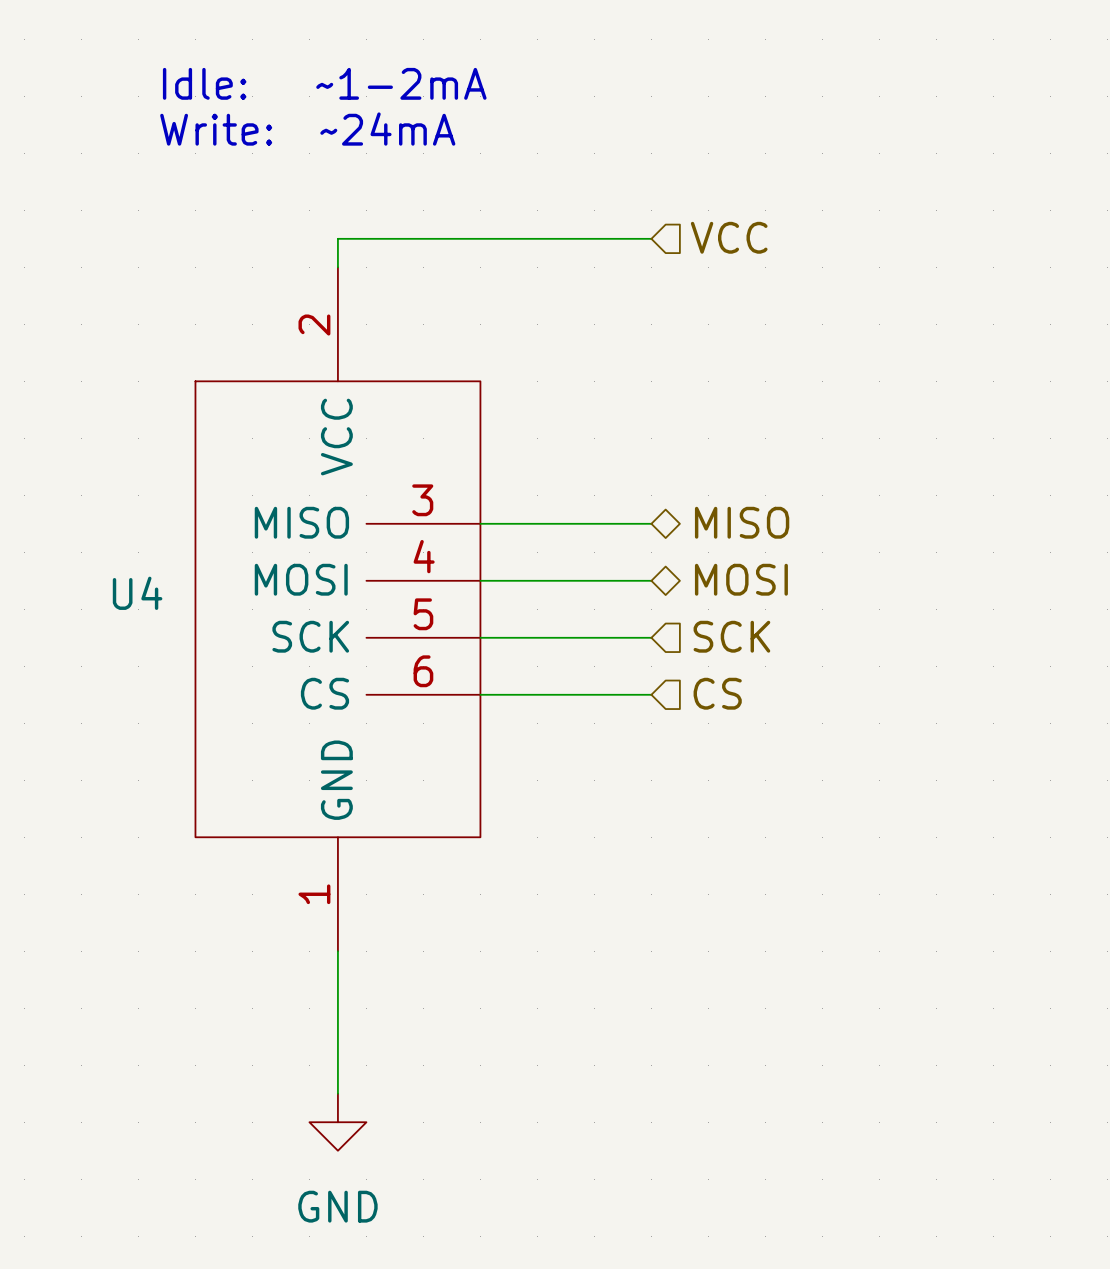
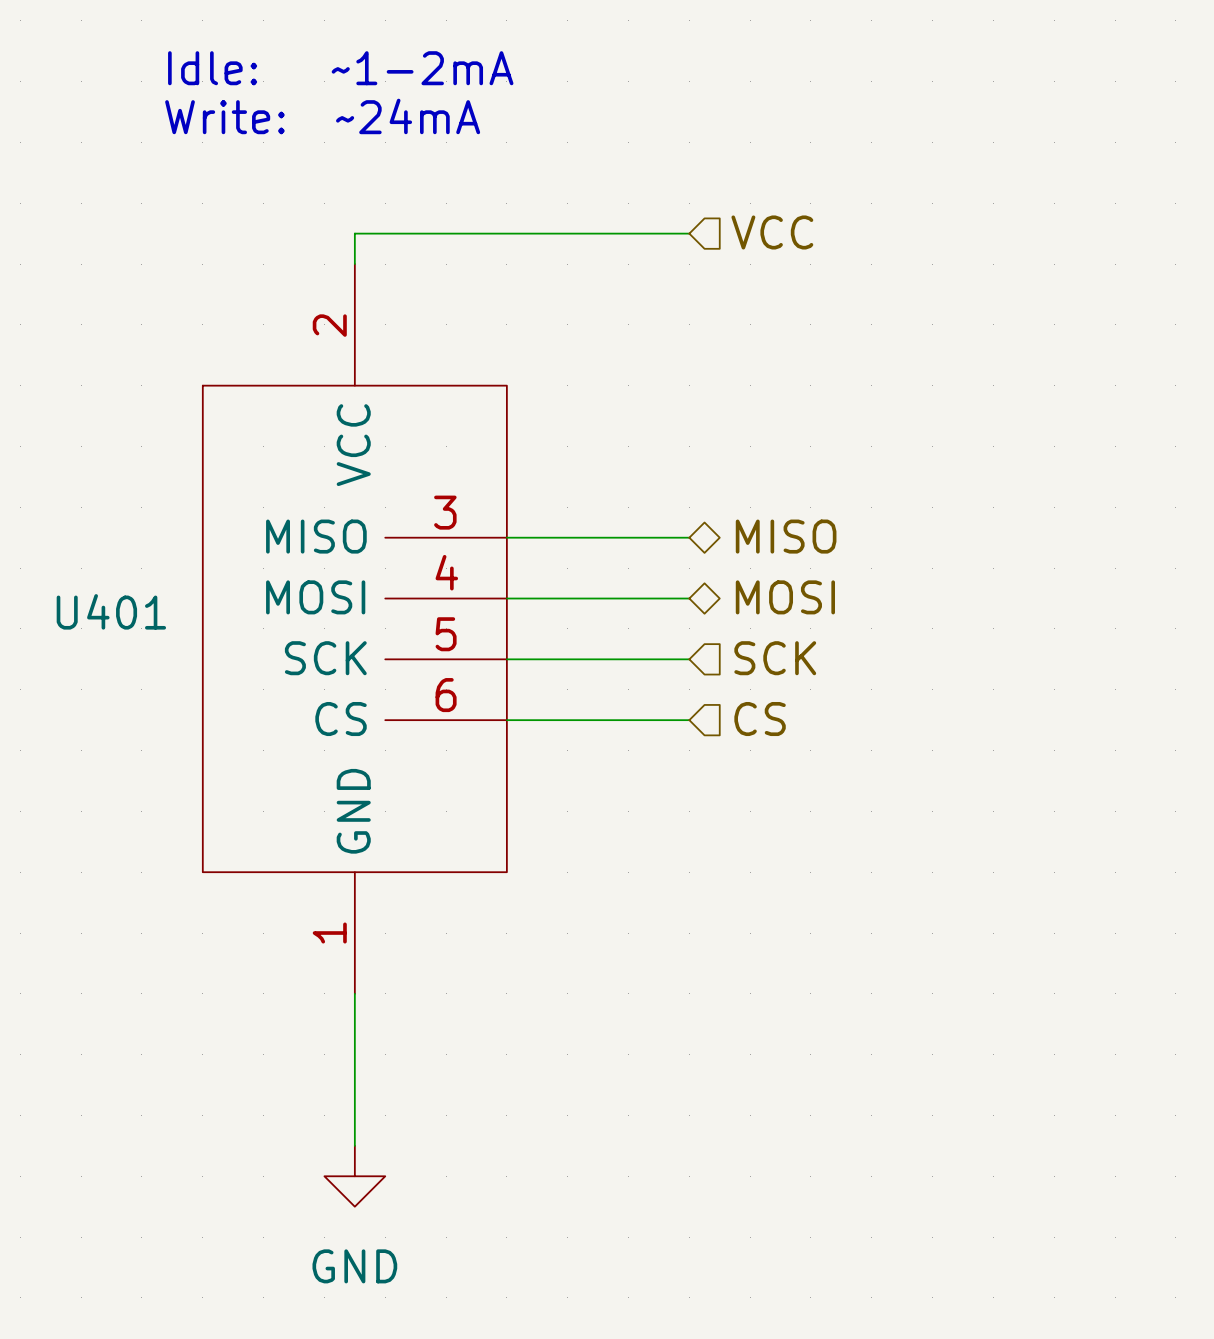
U4 name: U4 (137, 593) -> U401 (111, 611)

